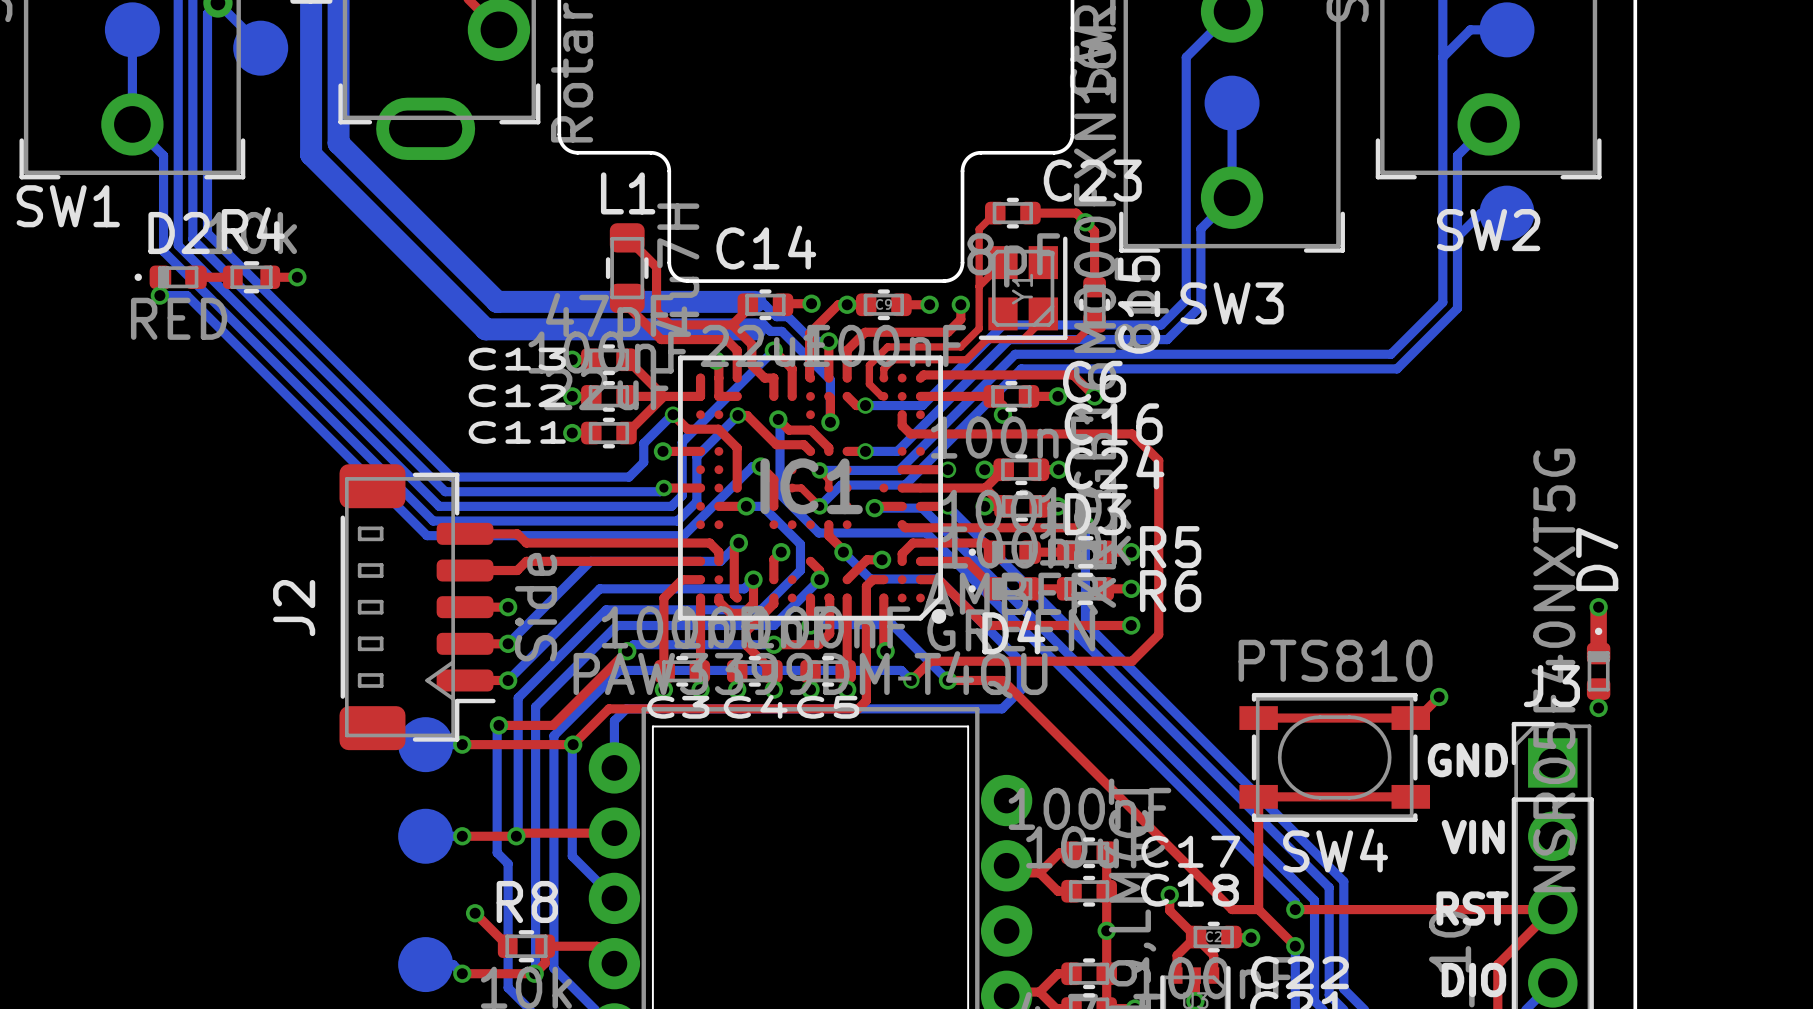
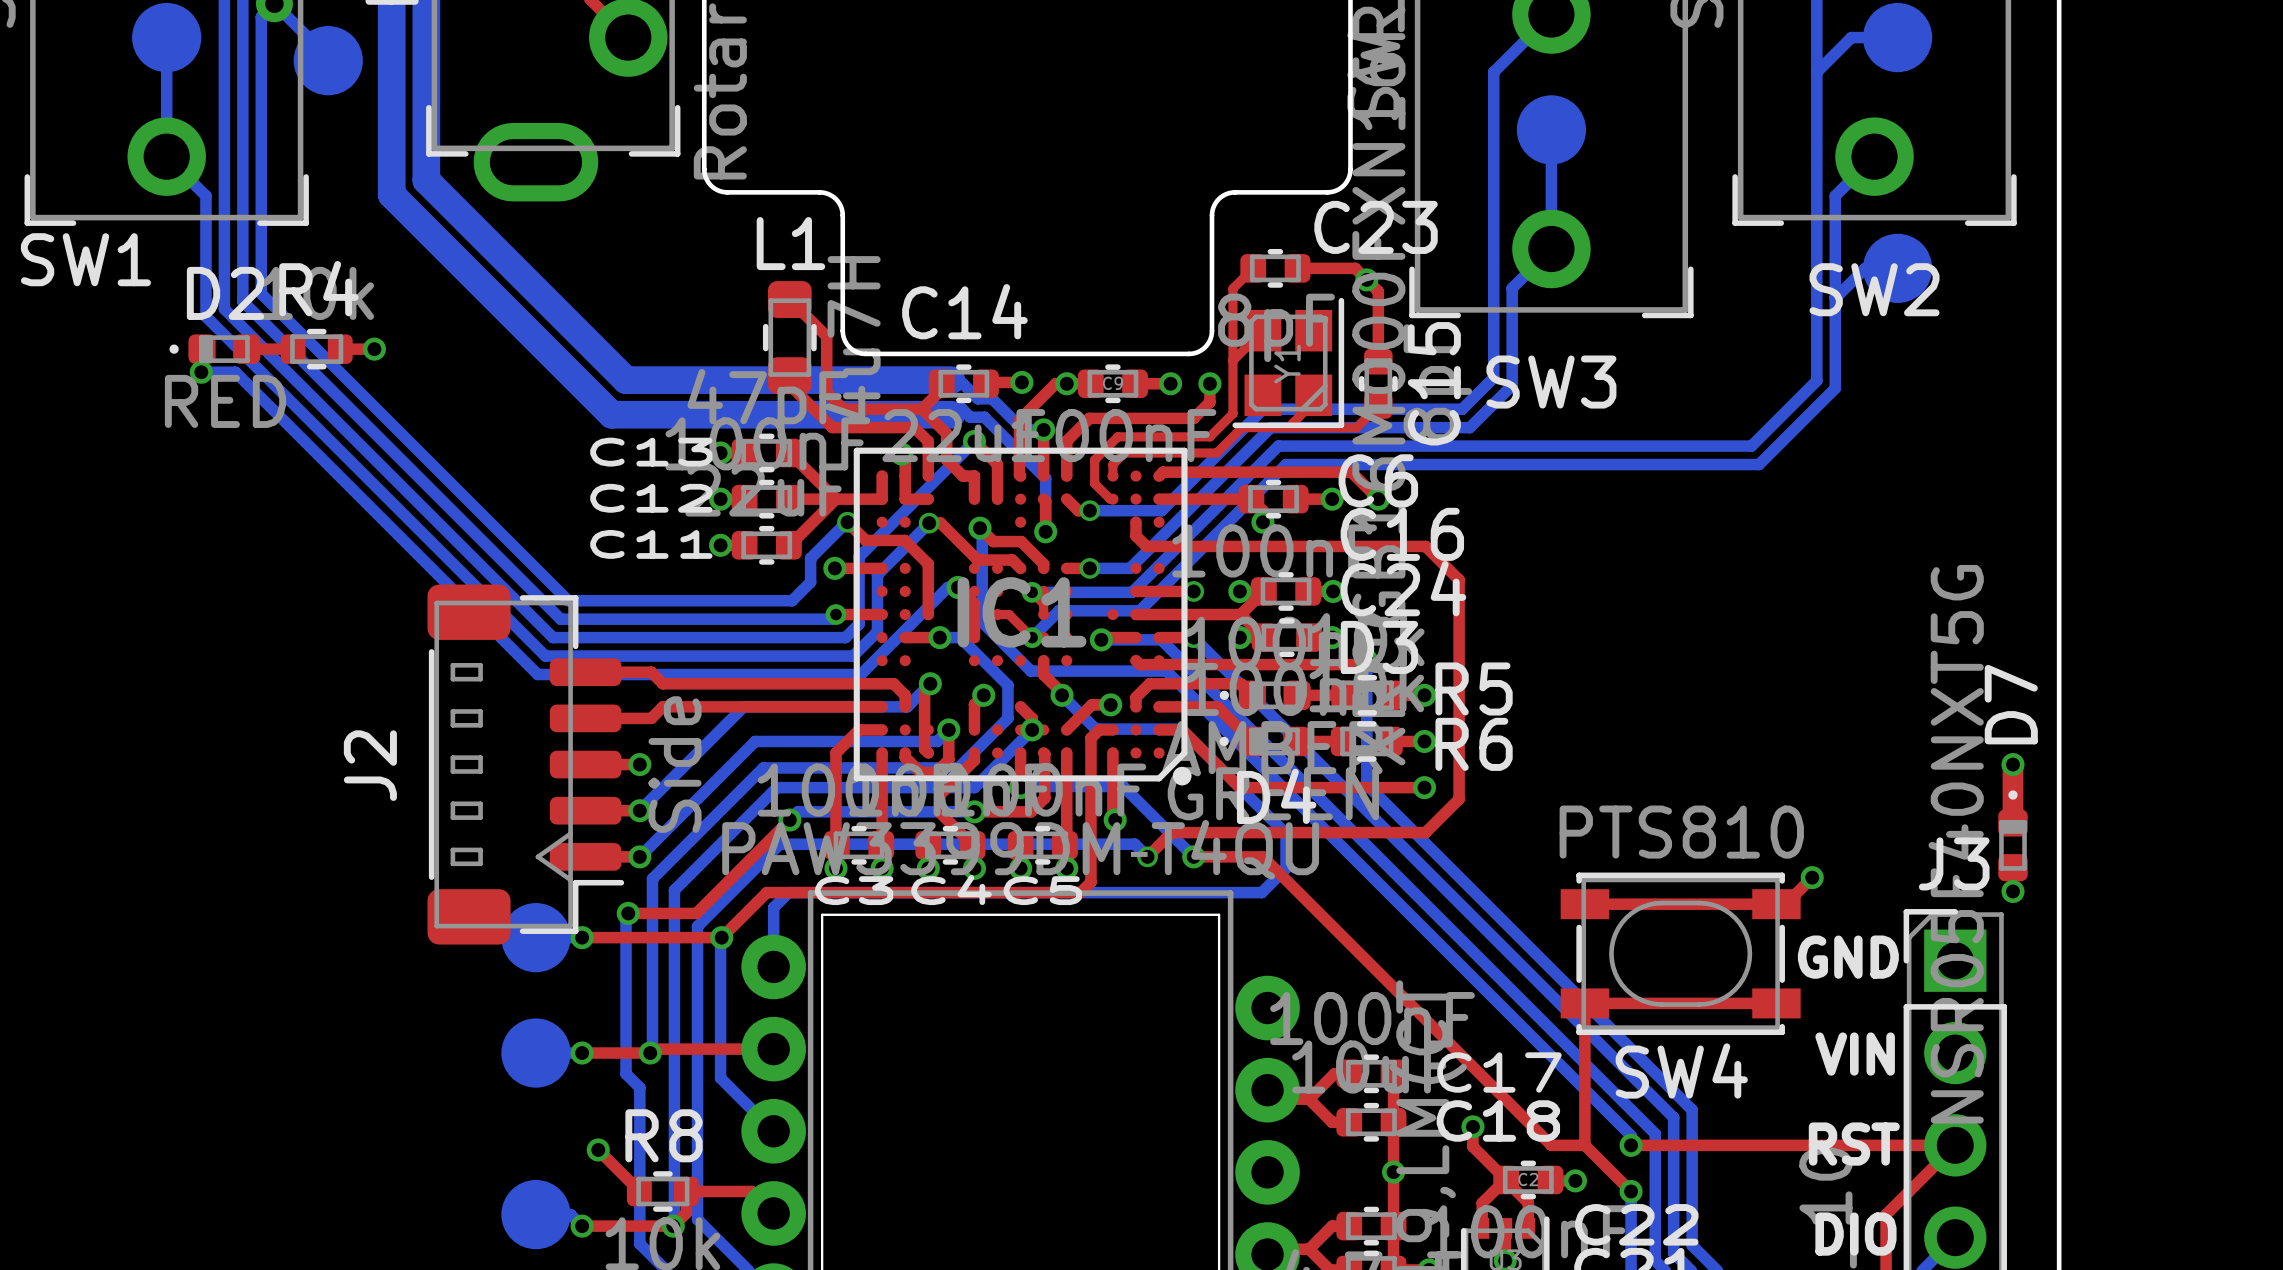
IC1 footprint: [678, 355, 947, 624] -> [853, 447, 1192, 786]

